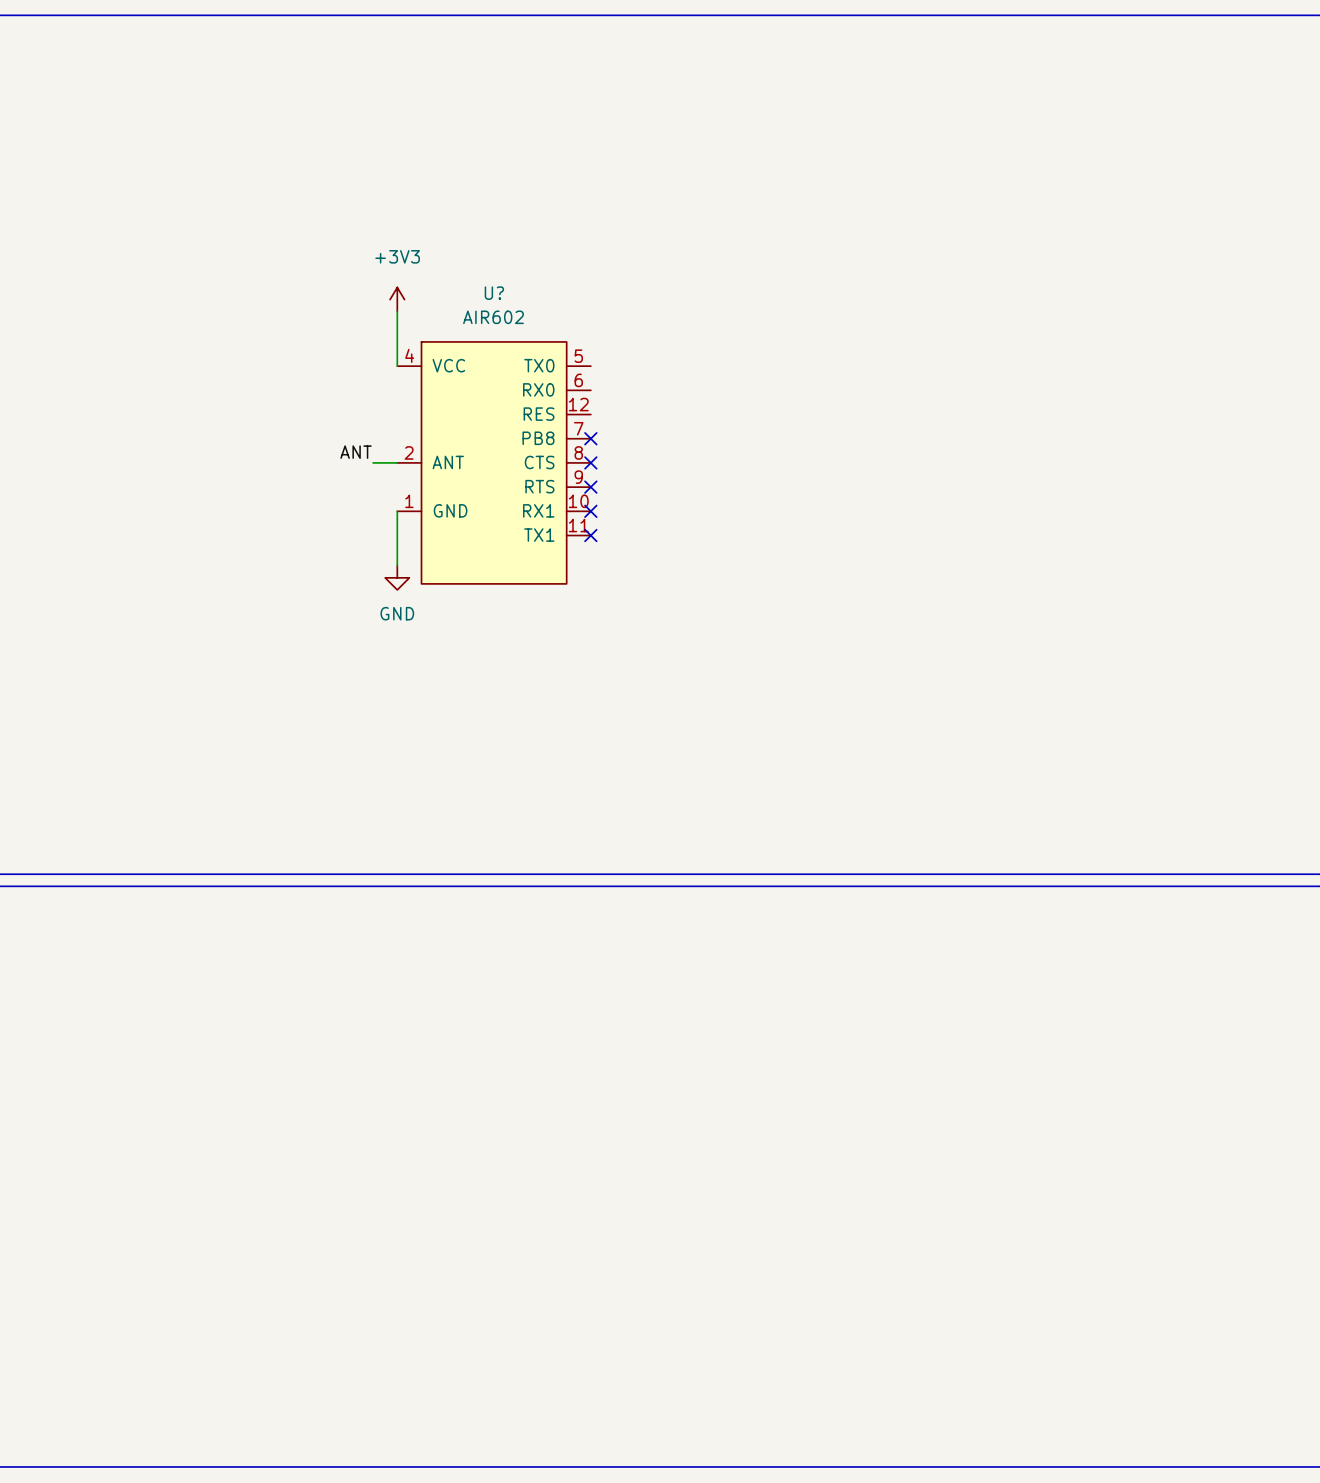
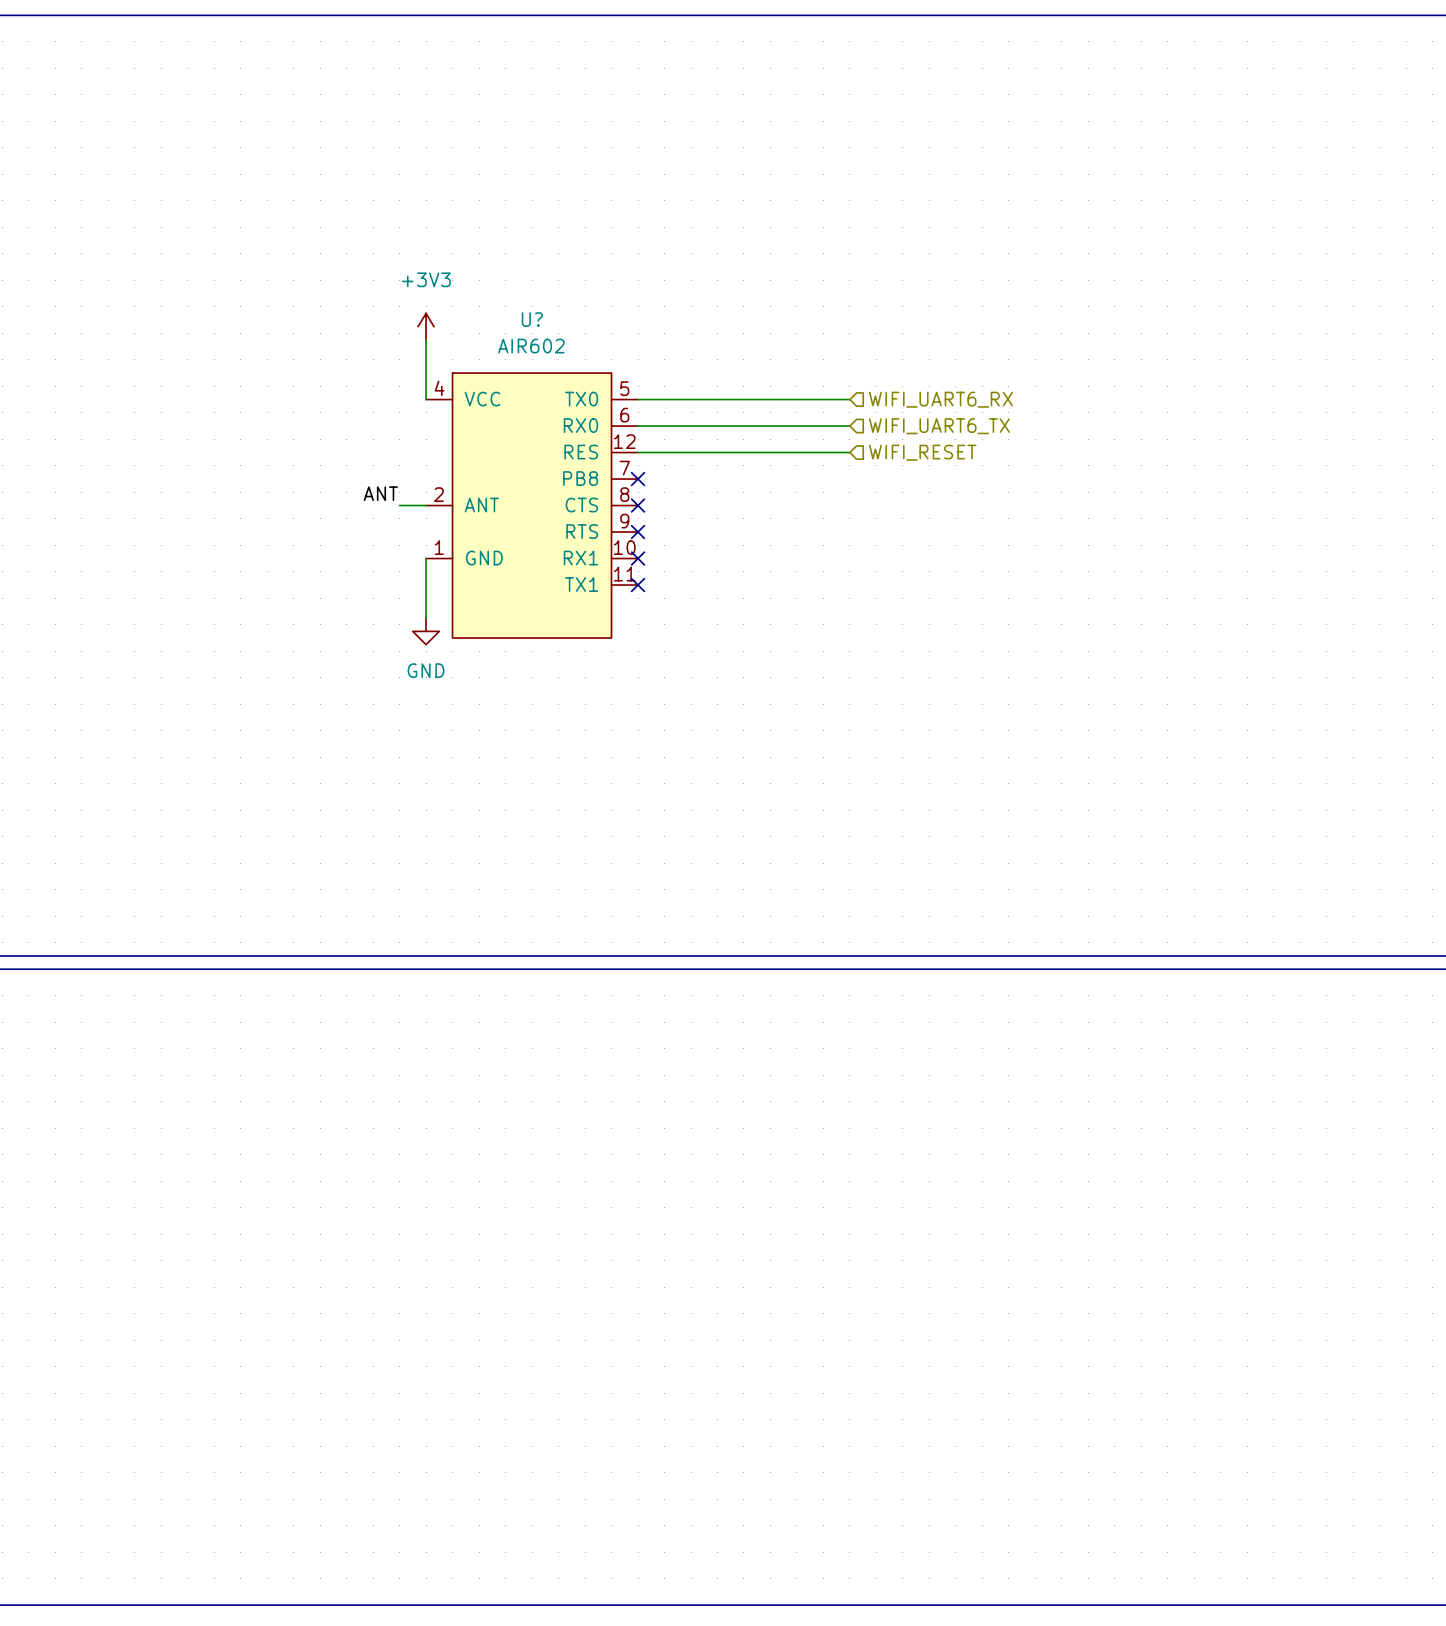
wire: none -> (638, 399) (849, 399)
hierarchical label: none -> WIFI_UART6_RX (941, 399)
wire: none -> (638, 426) (849, 426)
hierarchical label: none -> WIFI_UART6_TX (939, 426)
wire: none -> (638, 452) (849, 452)
hierarchical label: none -> WIFI_RESET (922, 452)

